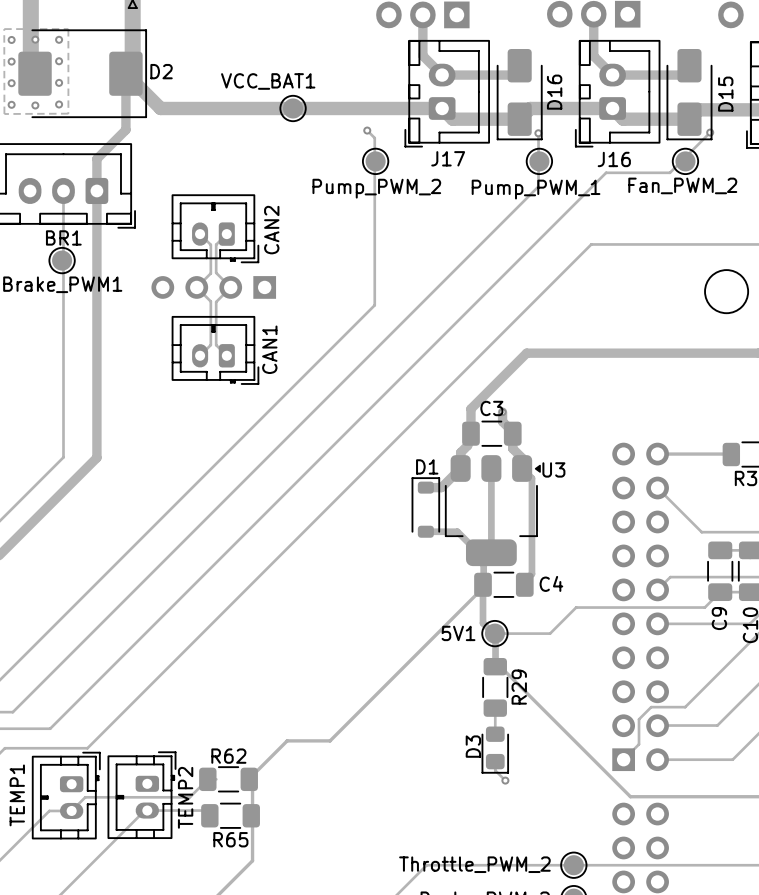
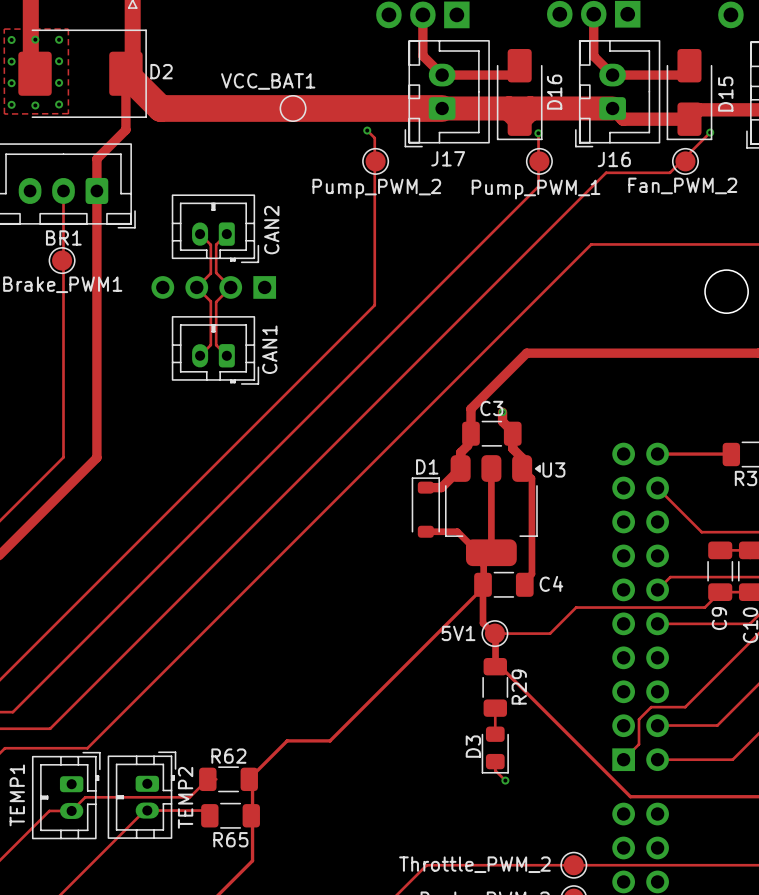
track width: thin (130, 78) (160, 108) (442, 108) -> thick (130, 78) (160, 108) (442, 108)
track: (442, 108) (452, 119) (519, 119) -> (442, 108) (530, 108)
track width: thin (612, 108) (530, 108) (519, 119) -> thick (612, 108) (530, 108) (519, 119)

